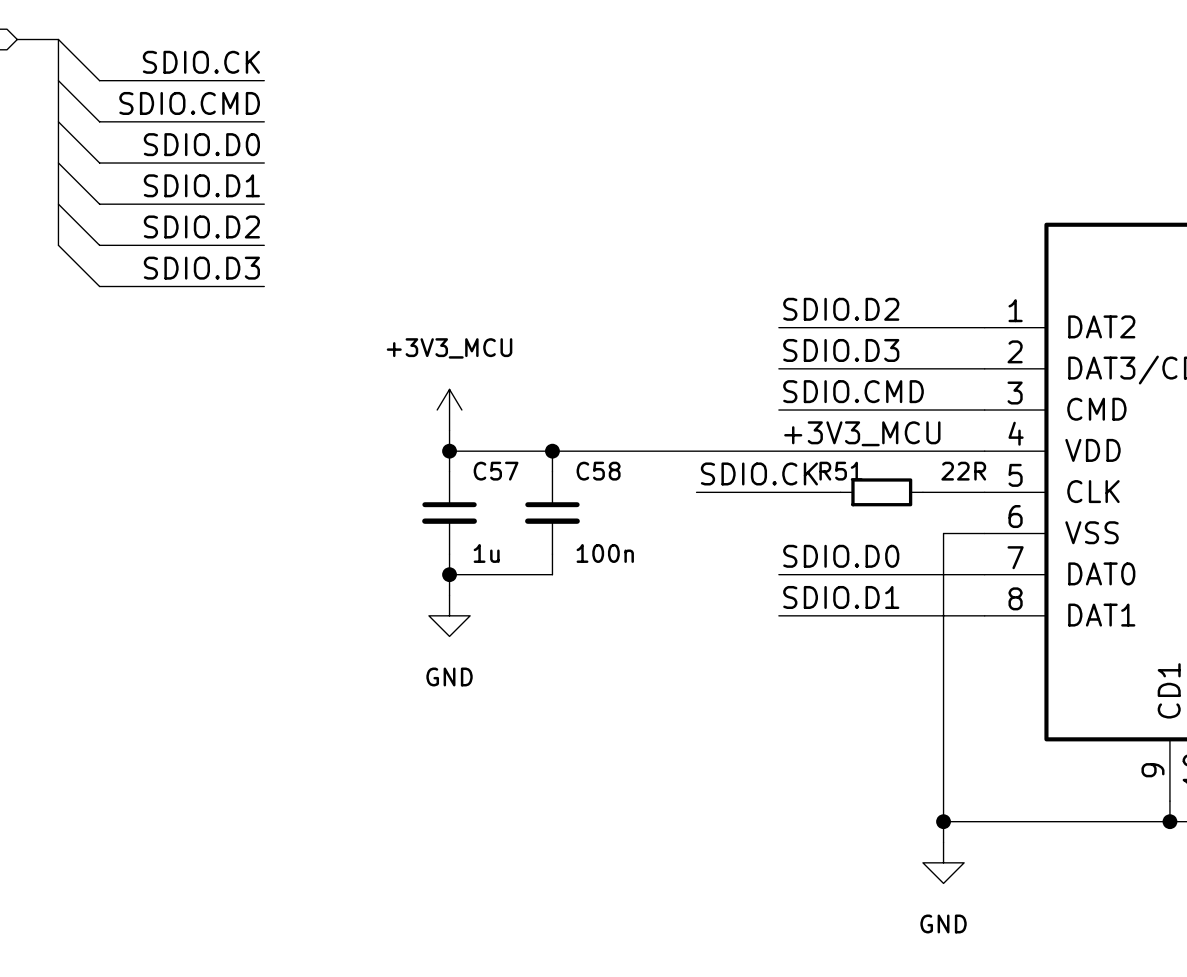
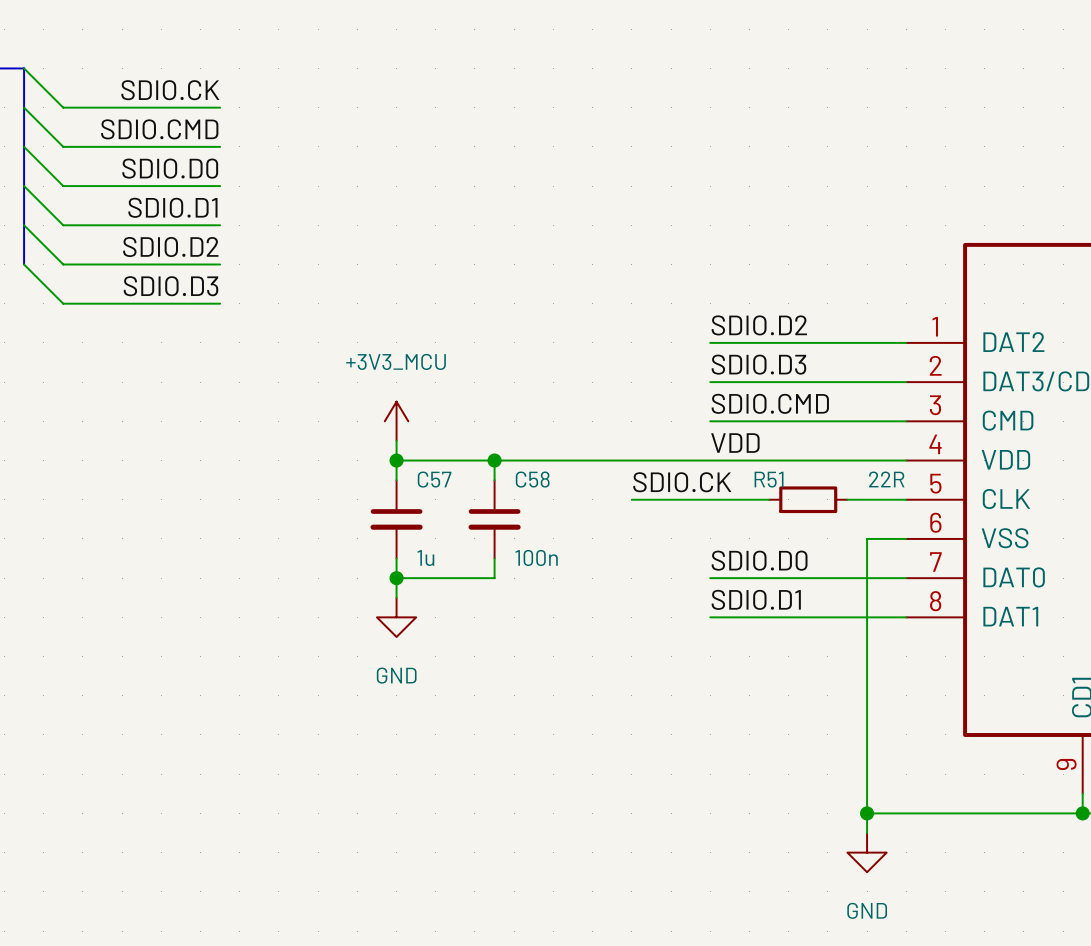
label: +3V3_MCU (862, 433) -> VDD (735, 443)

